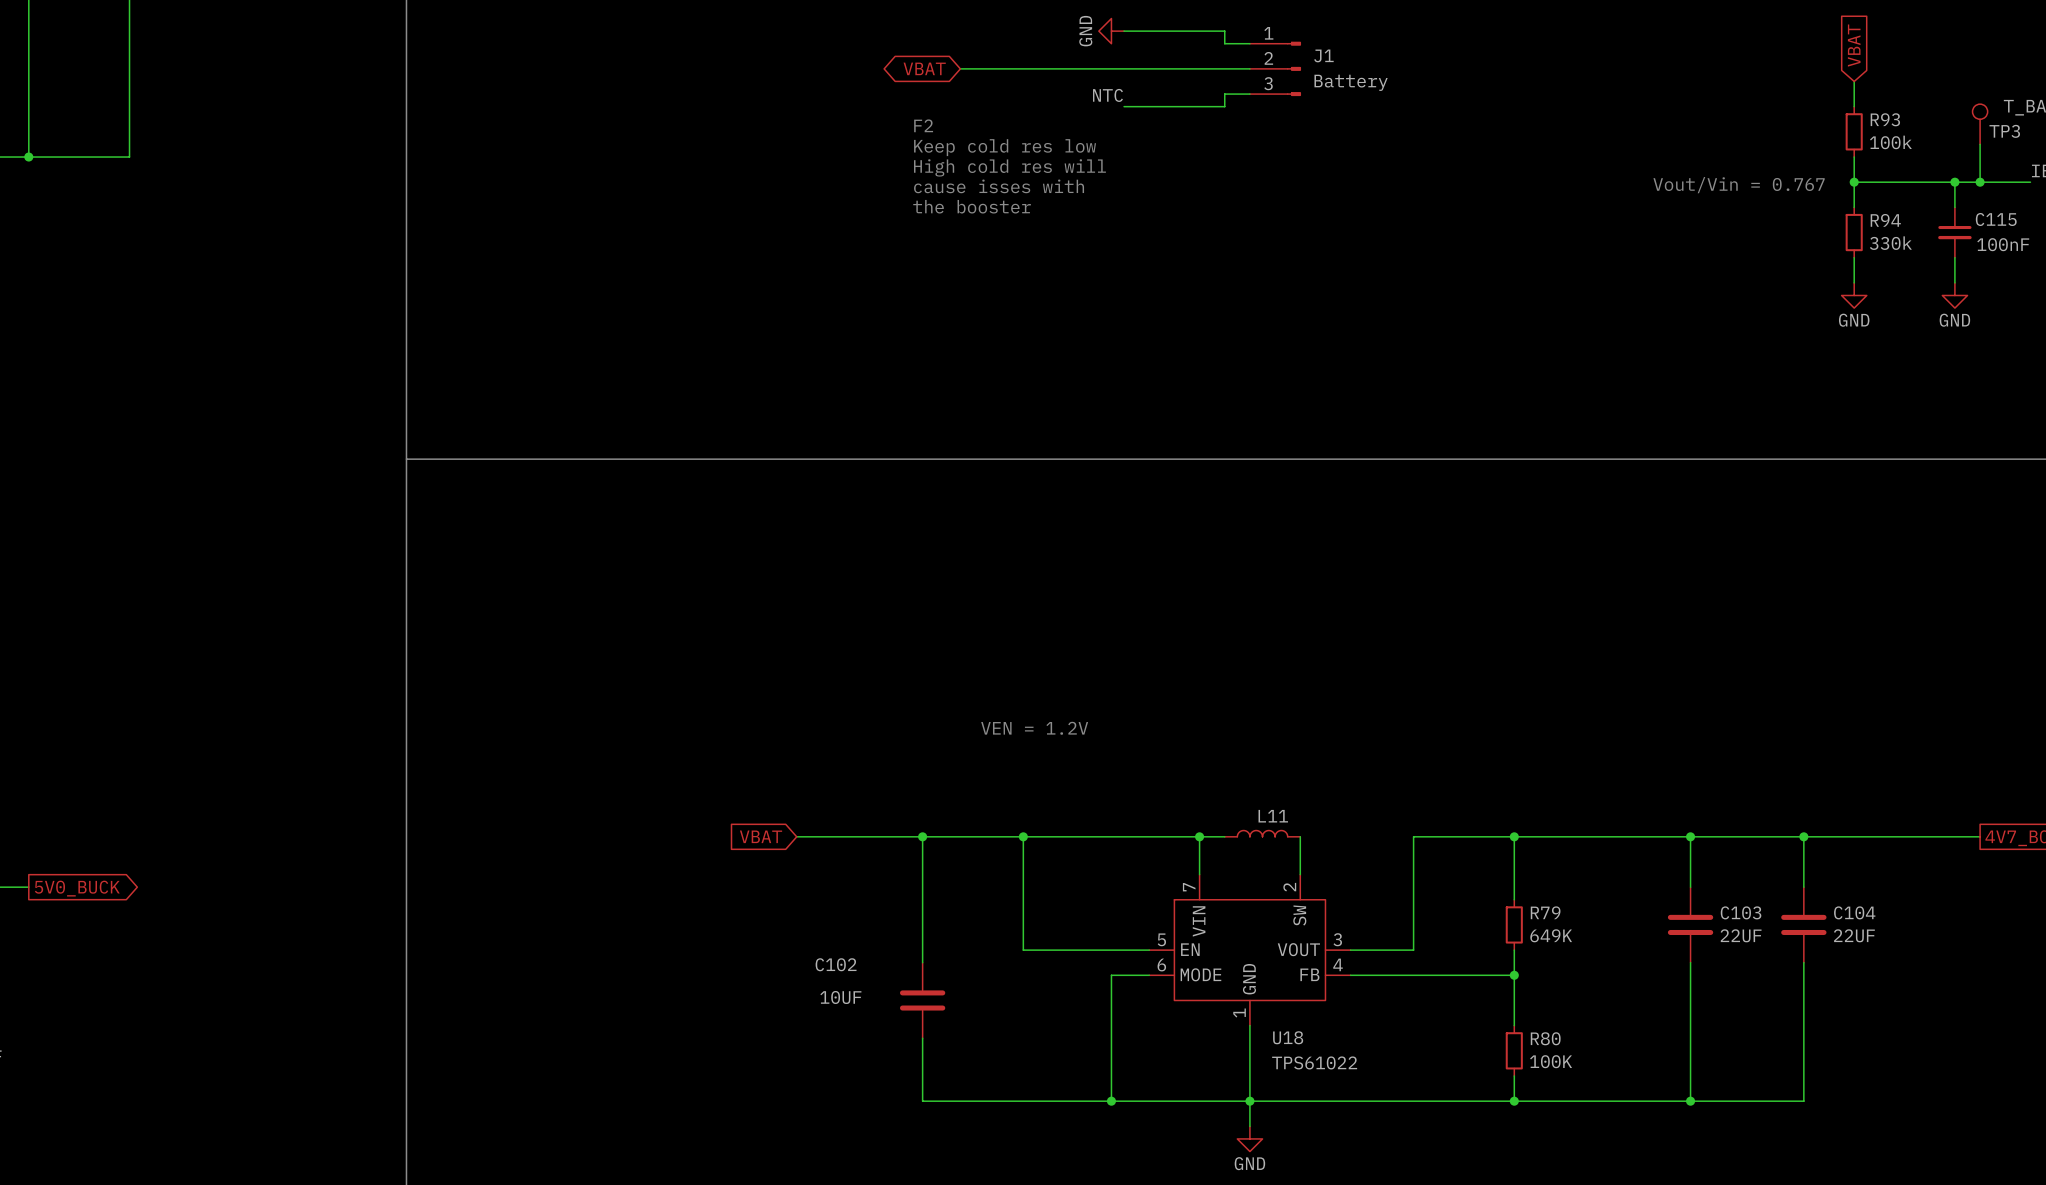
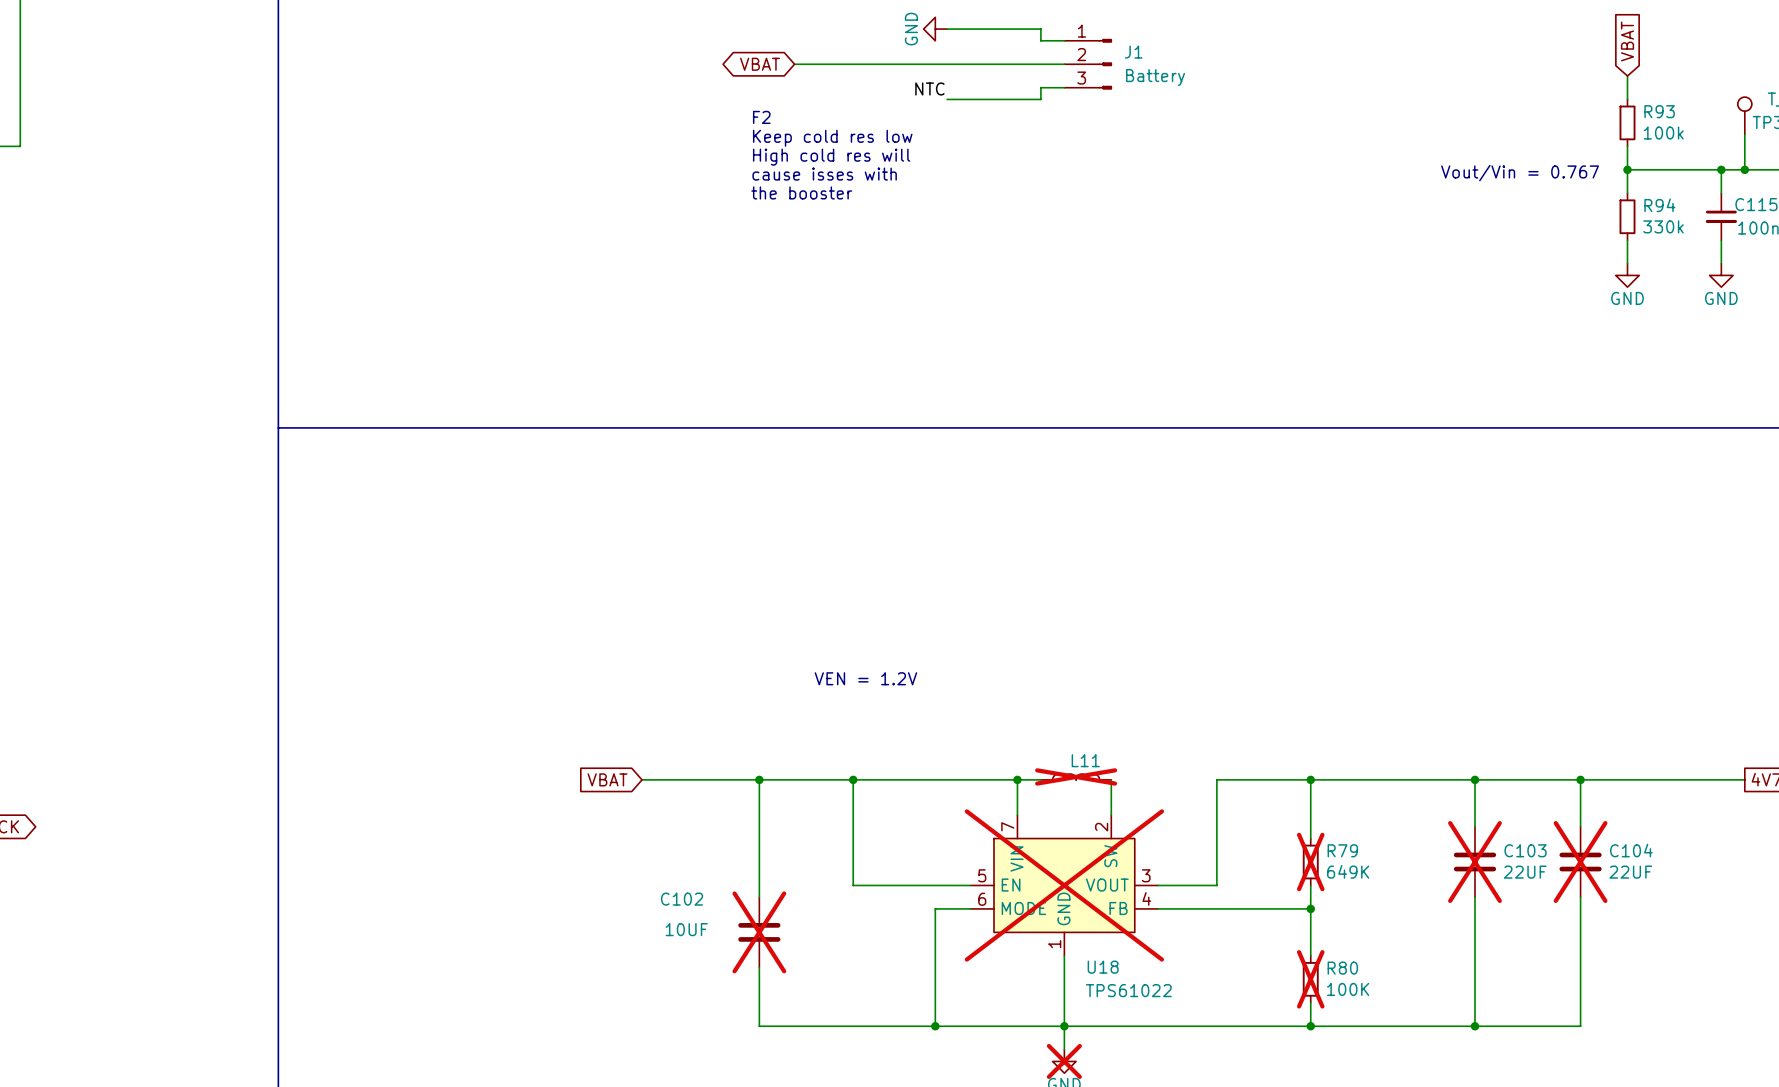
L11 do-not-place cross: none -> (1076, 776)
R79 do-not-place cross: none -> (1310, 862)
C103 do-not-place cross: none -> (1474, 862)
C104 do-not-place cross: none -> (1580, 862)
U18 do-not-place cross: none -> (1064, 885)
C102 do-not-place cross: none -> (759, 932)
R80 do-not-place cross: none -> (1310, 979)
power symbol do-not-place cross: none -> (1064, 1061)

